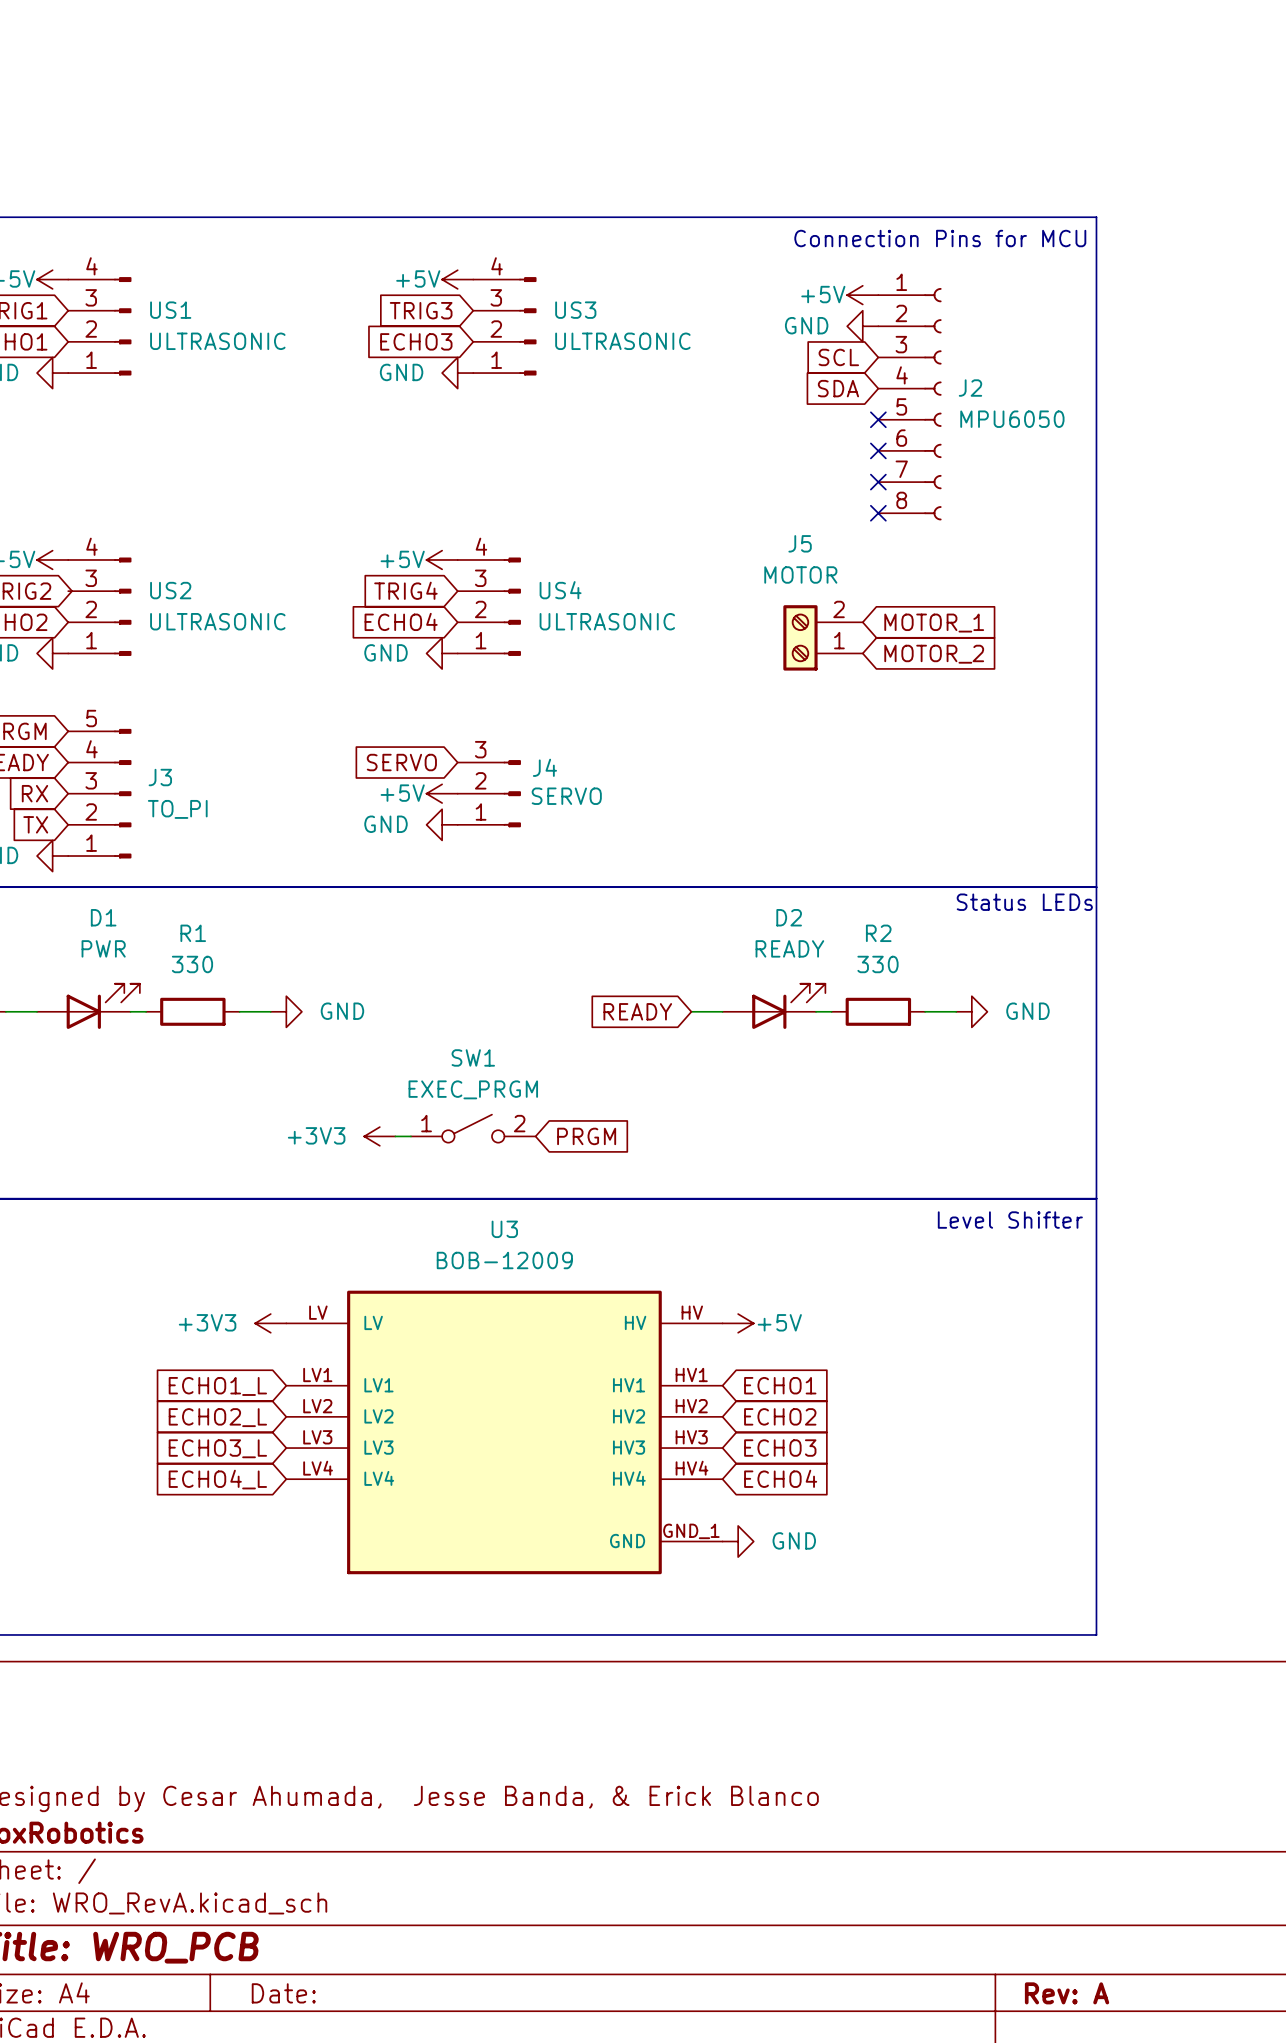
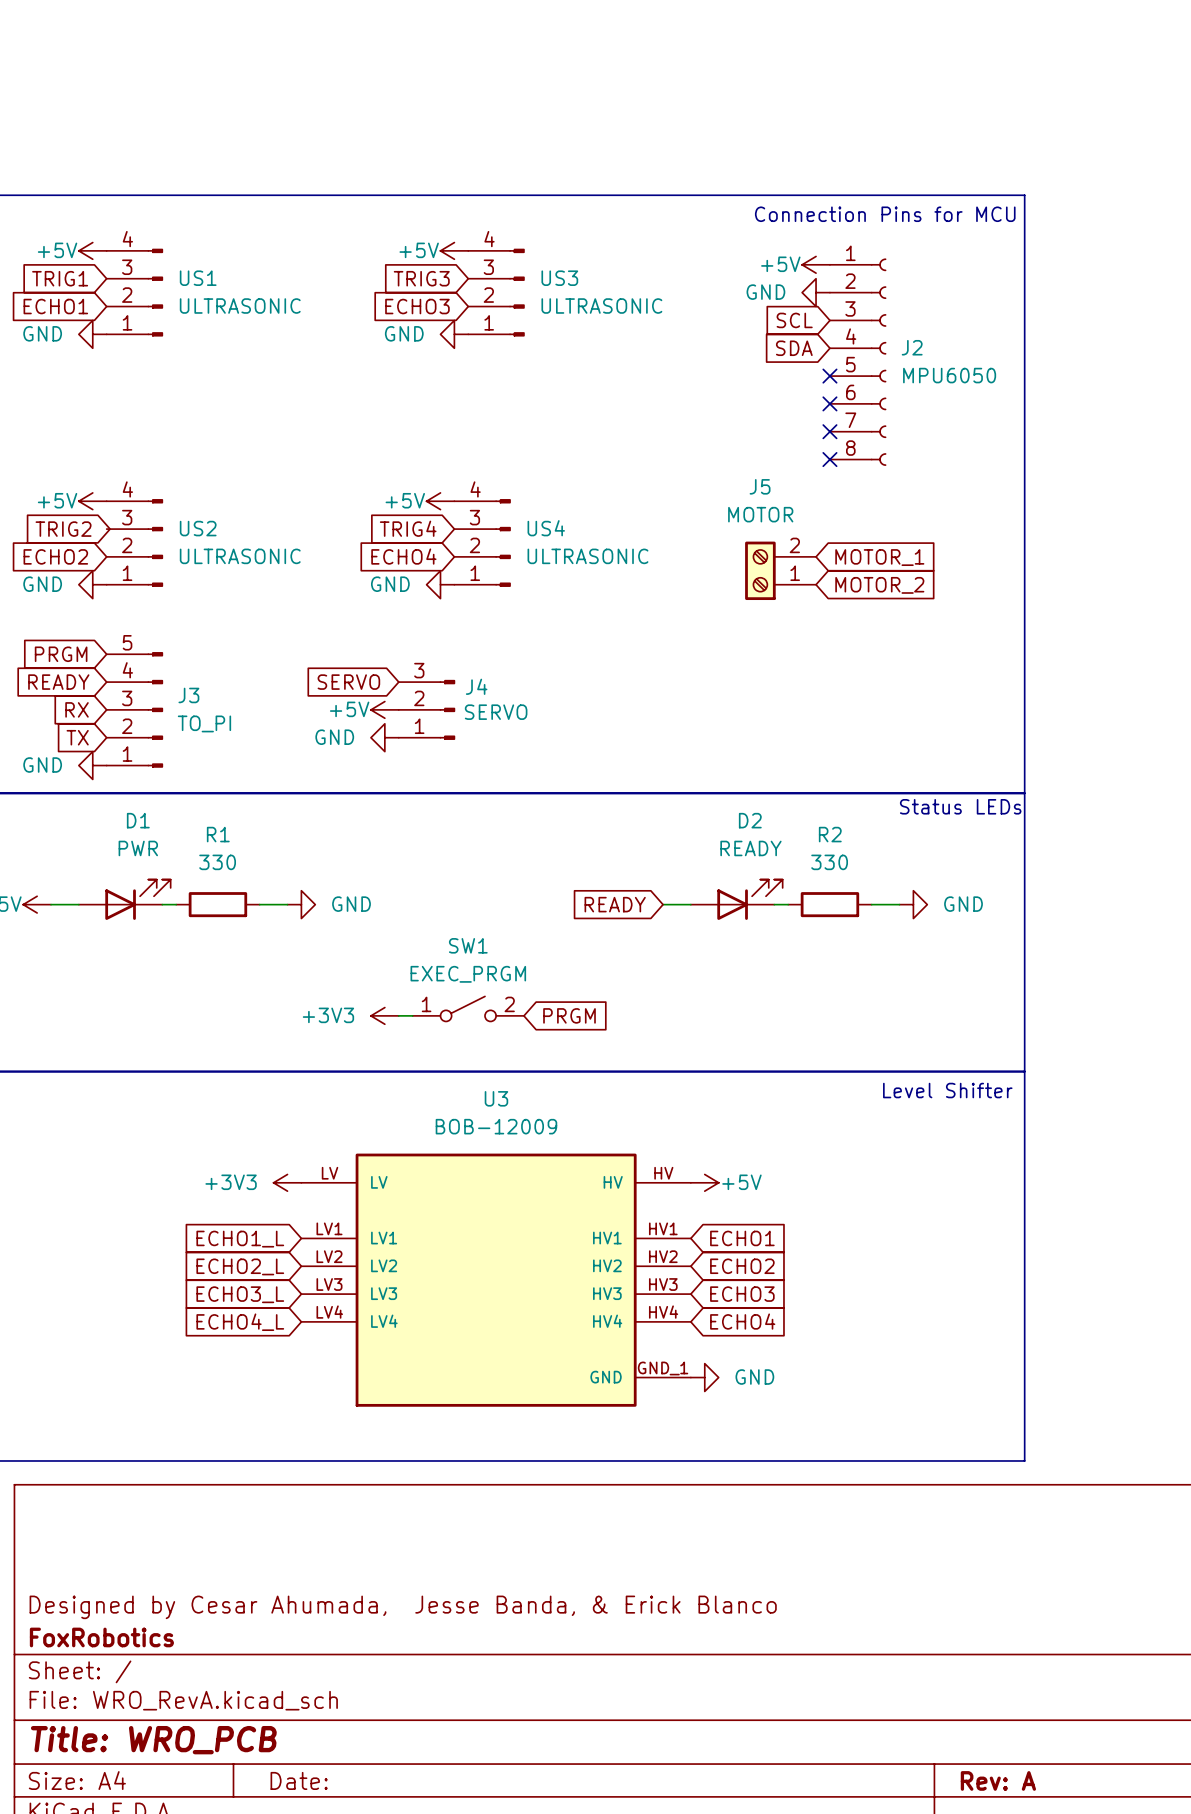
global label position: SERVO (401, 762) -> SERVO (348, 682)
power symbol position: +5V (442, 793) -> +5V (384, 709)
J4 position: (489, 793) -> (427, 709)
power symbol position: GND (442, 824) -> GND (384, 737)

